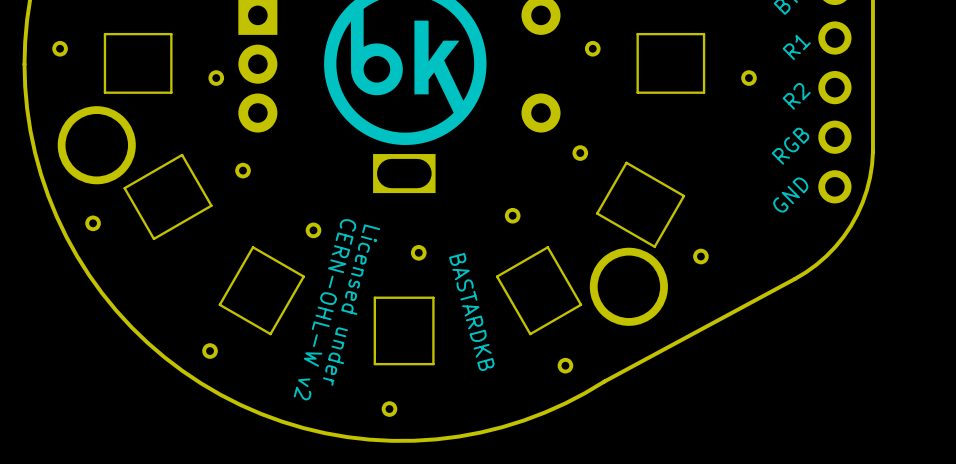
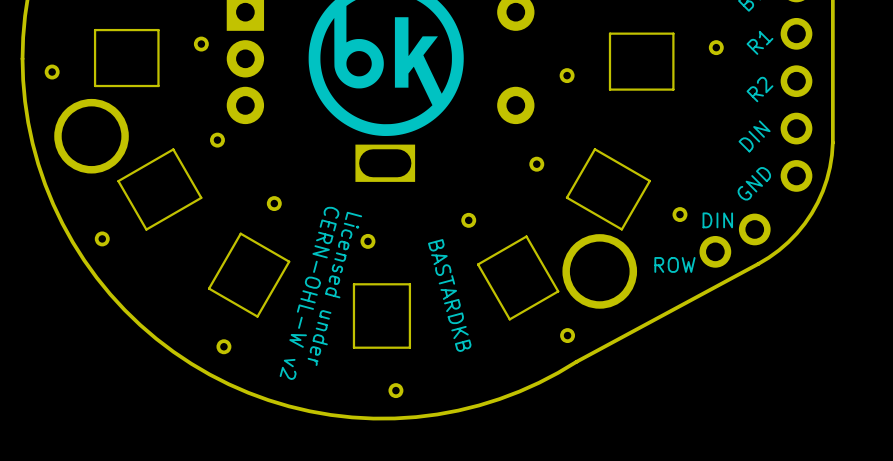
part footprint: [52, 32, 225, 94] -> [44, 28, 209, 88]
part footprint: [584, 32, 757, 94] -> [559, 32, 724, 91]
part footprint: [572, 145, 709, 265] -> [529, 148, 688, 231]
text: RGB (790, 146) -> DIN (754, 136)
part footprint: [85, 153, 251, 241] -> [94, 132, 225, 247]
part footprint: [495, 207, 583, 374] -> [461, 212, 576, 344]
part footprint: [202, 222, 322, 359] -> [207, 196, 291, 355]
text: none -> DIN (717, 220)
part: none -> (754, 229)
part footprint: [373, 245, 435, 417] -> [352, 233, 412, 399]
part: none -> (715, 251)
text: none -> ROW (674, 264)

